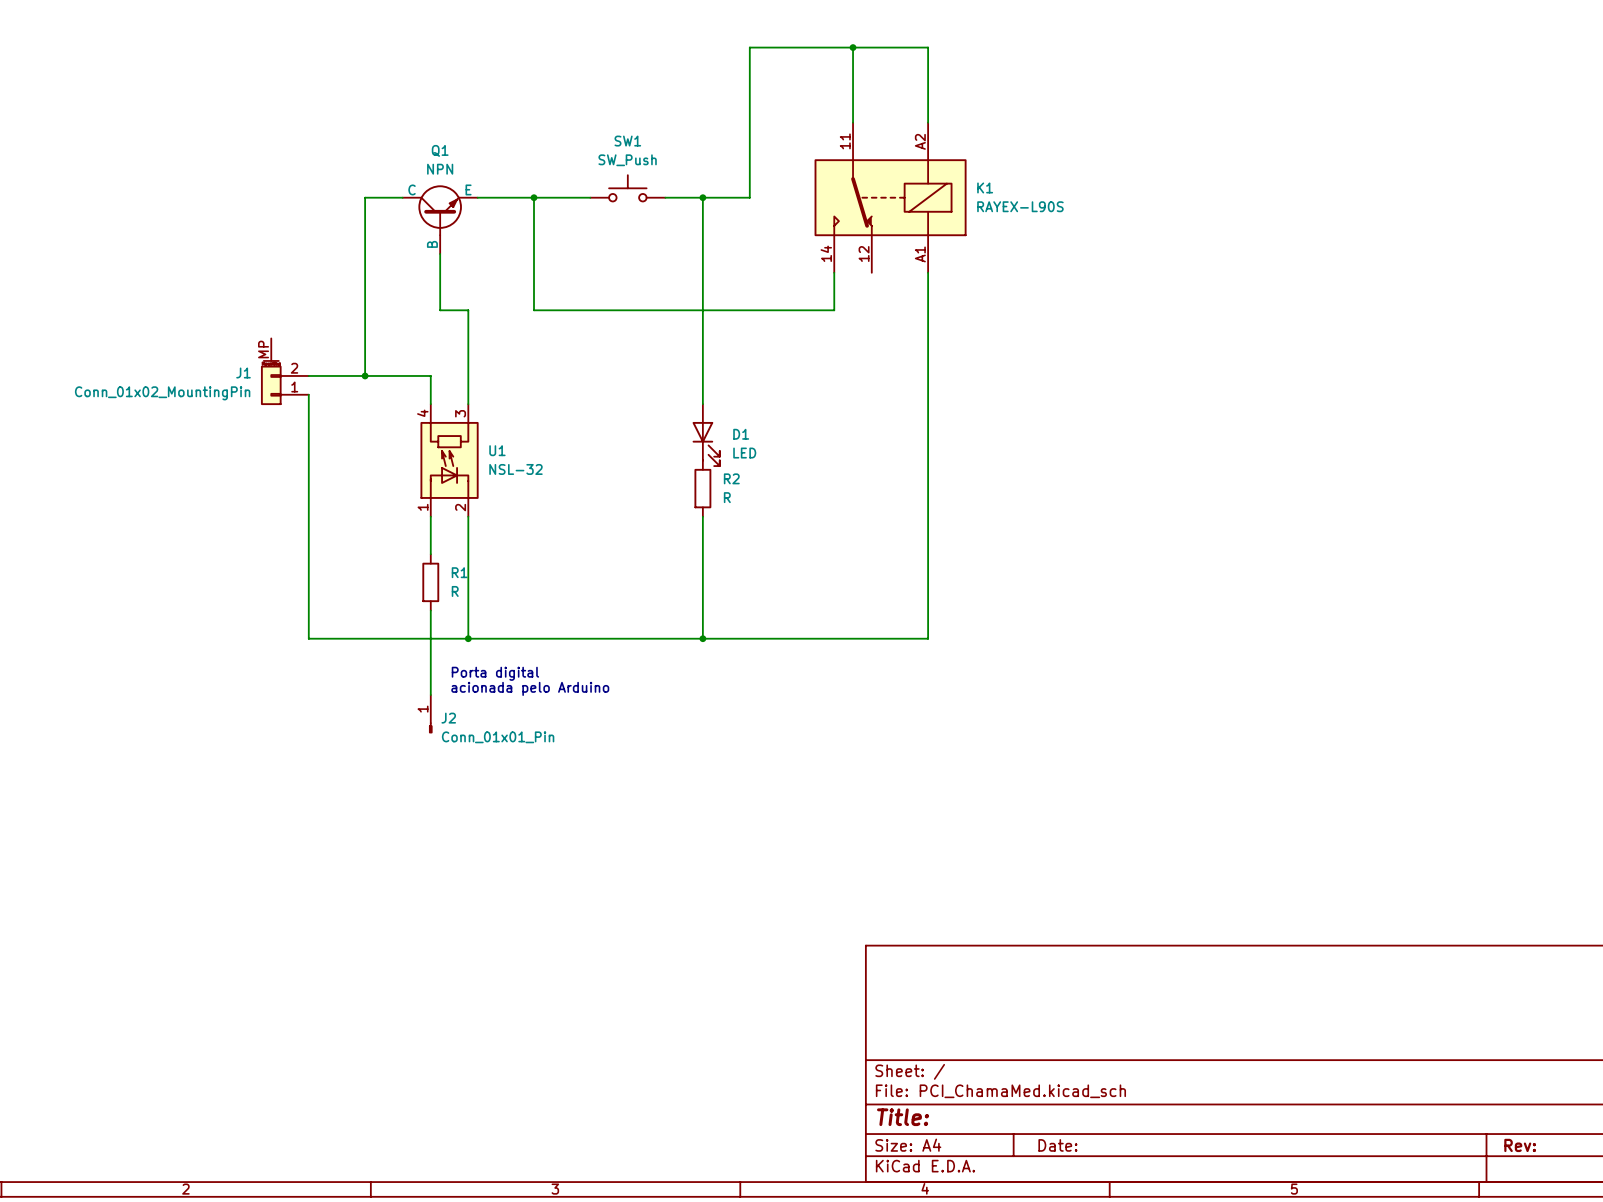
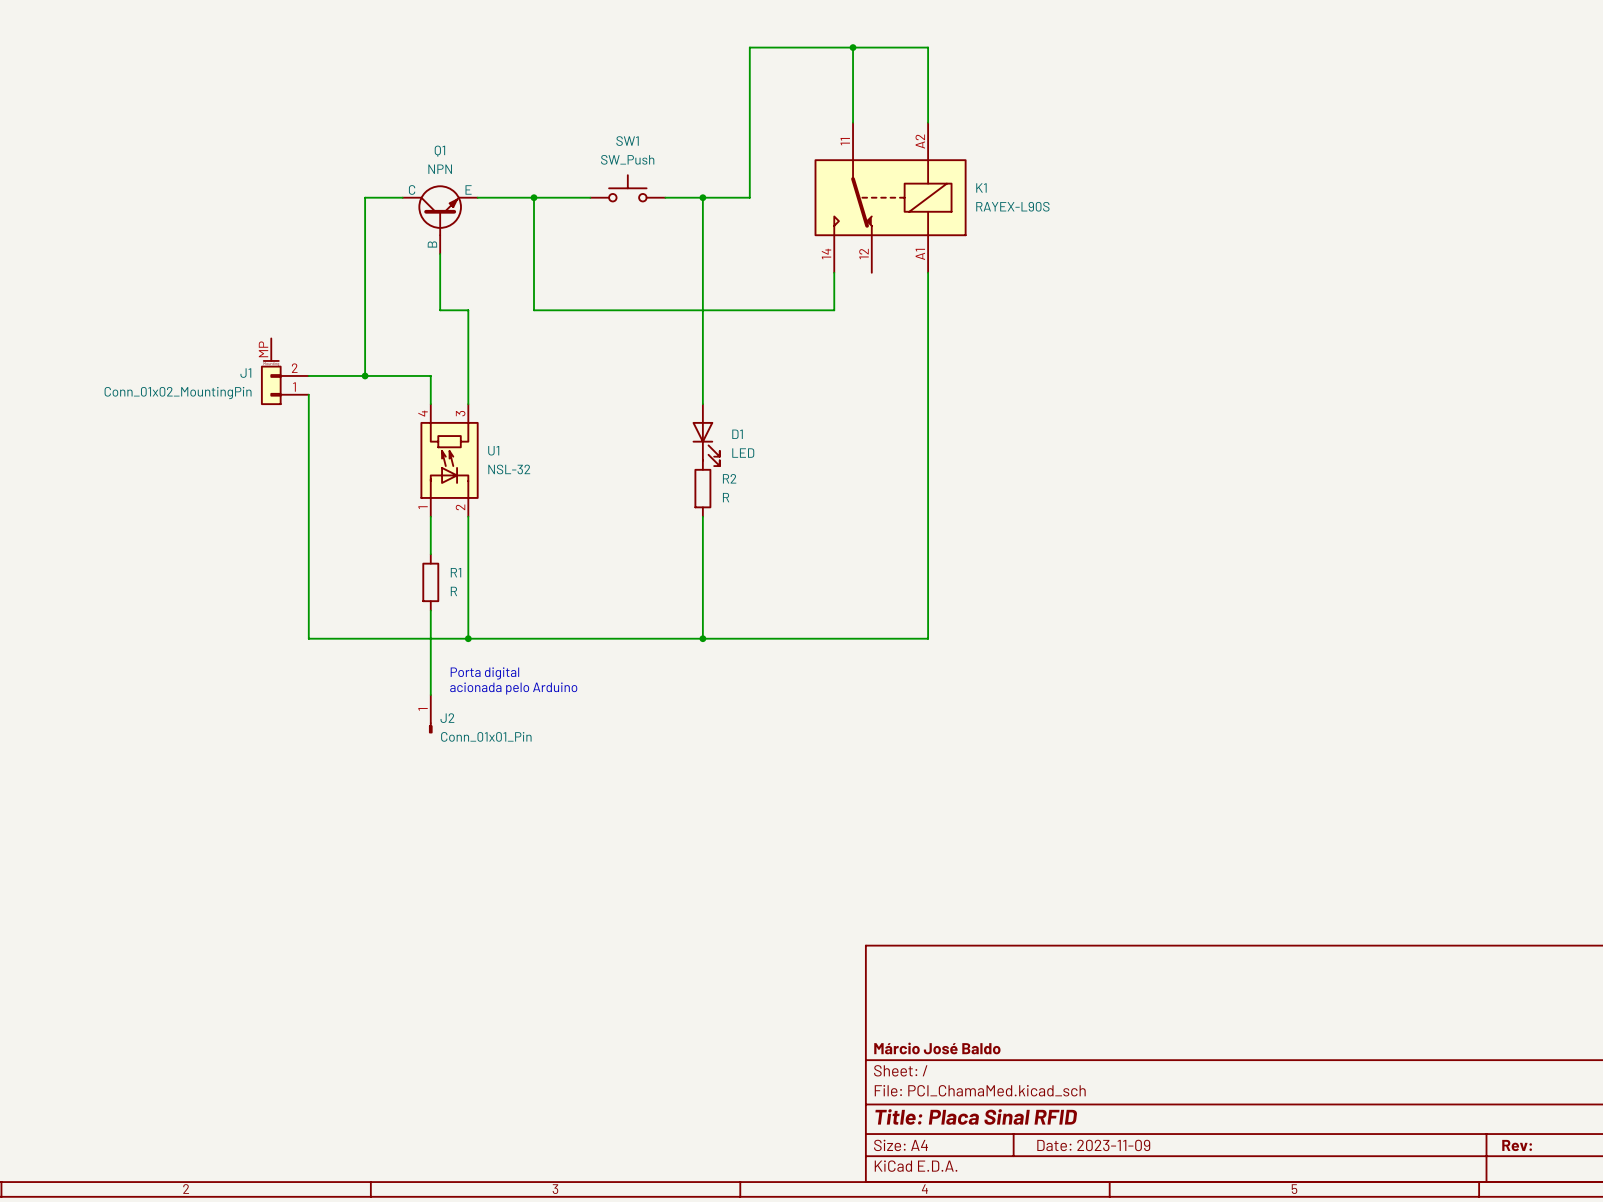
title block: none -> Márcio José Baldo (937, 1048)
title block: Title: (903, 1117) -> Title: Placa Sinal RFID (976, 1116)
title block: Date: (1057, 1145) -> Date: 2023-11-09 (1093, 1145)

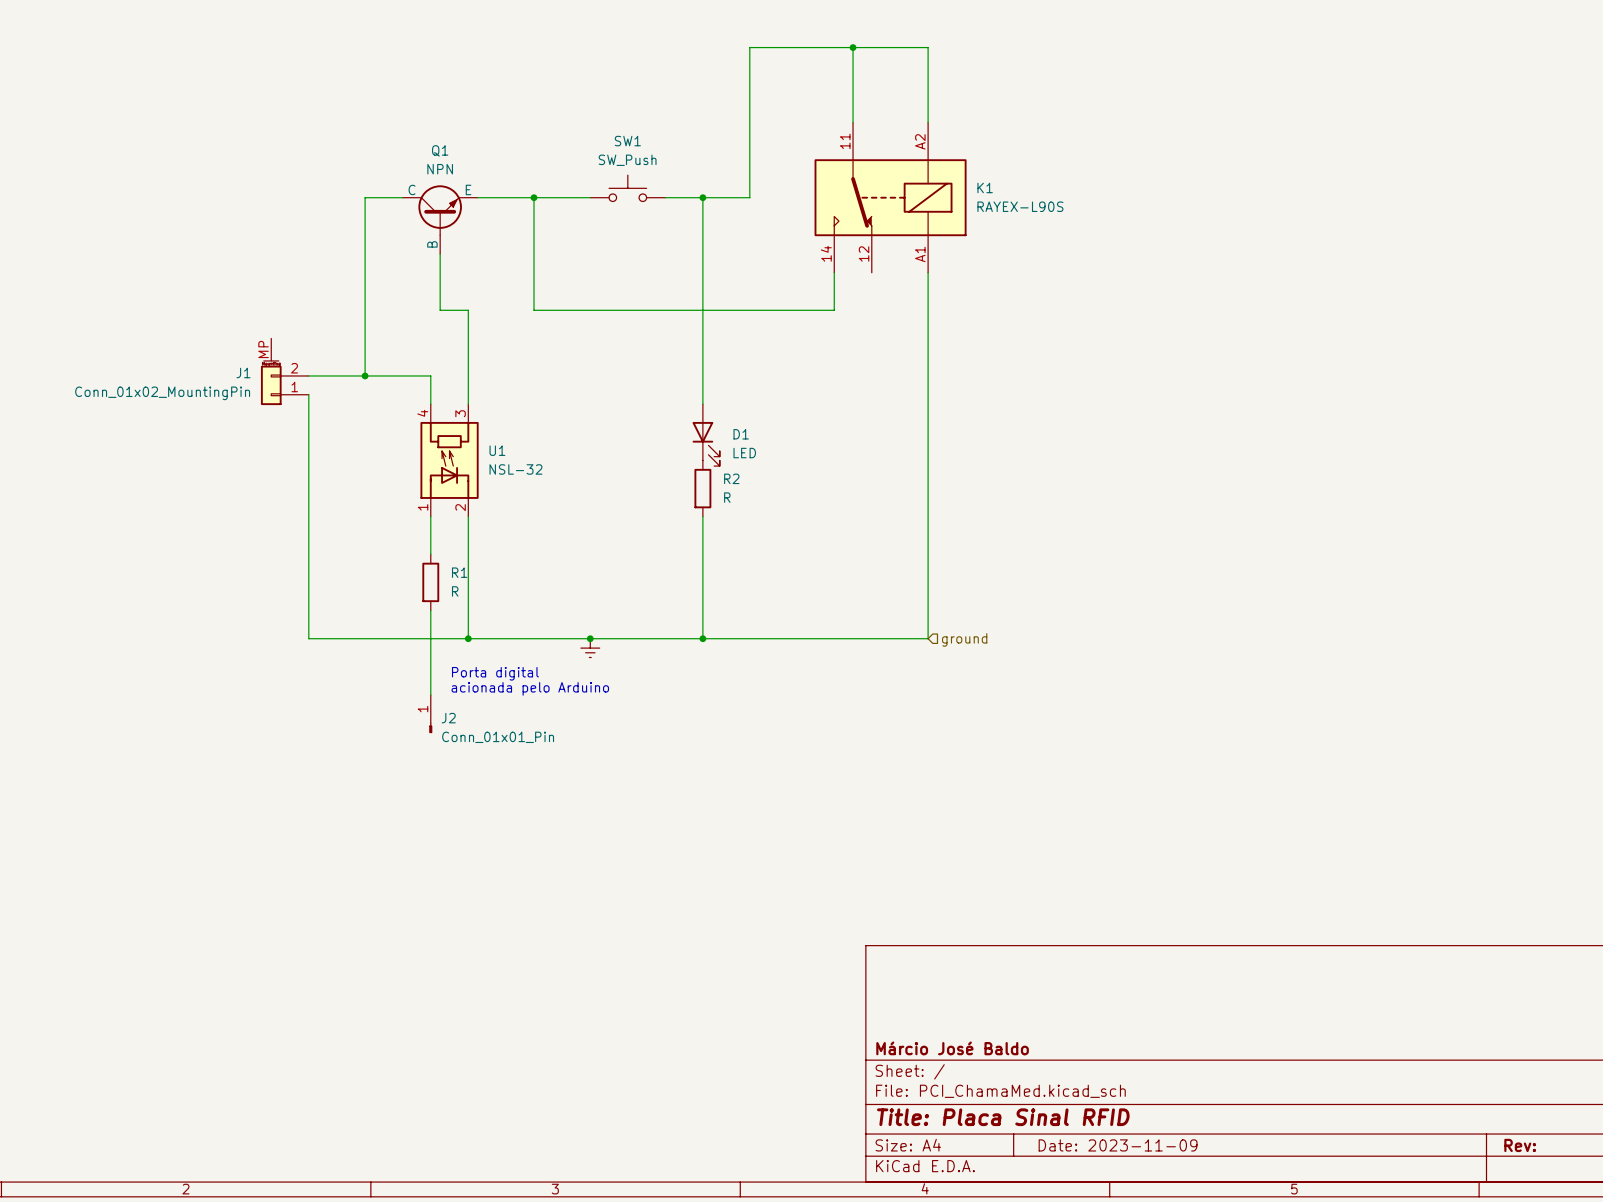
junction: none -> (590, 638)
hierarchical label: none -> ground (964, 639)
power symbol: none -> (590, 648)

